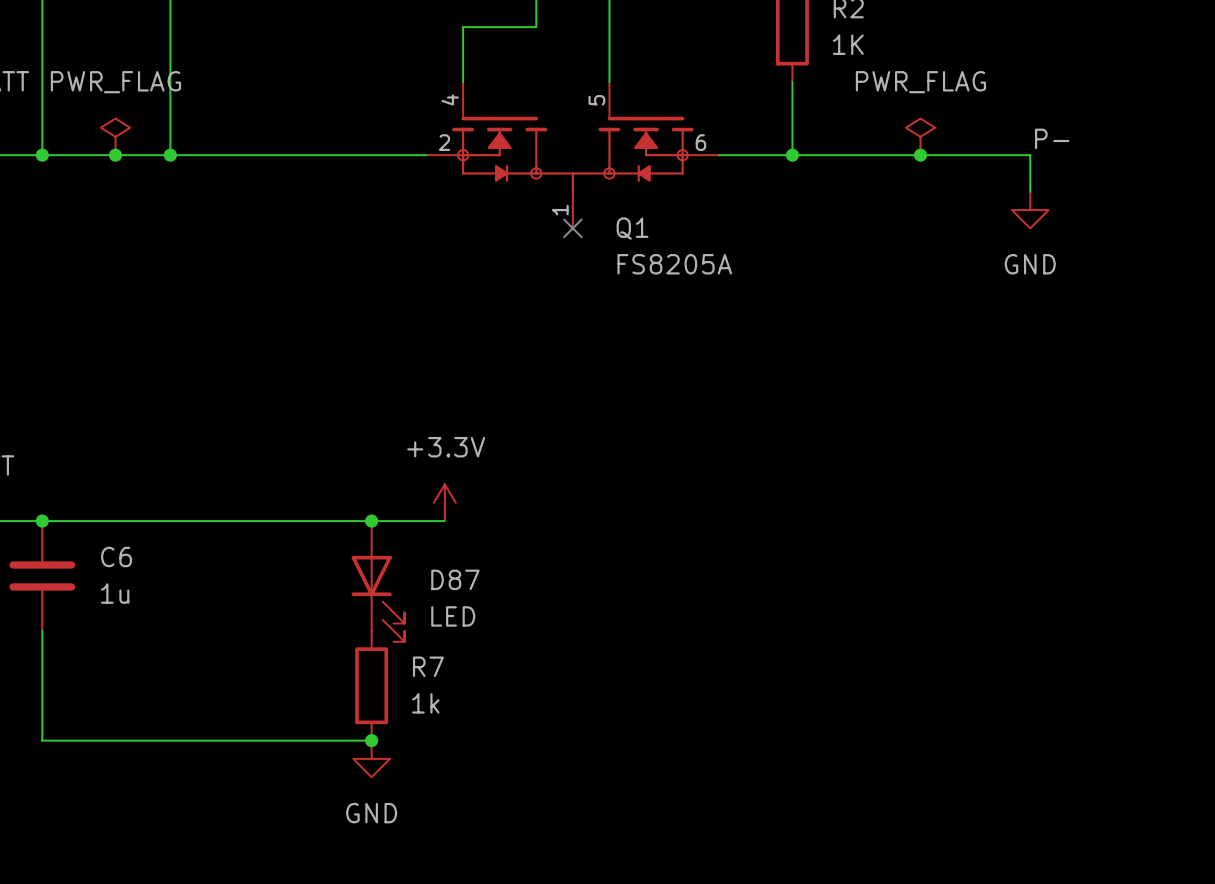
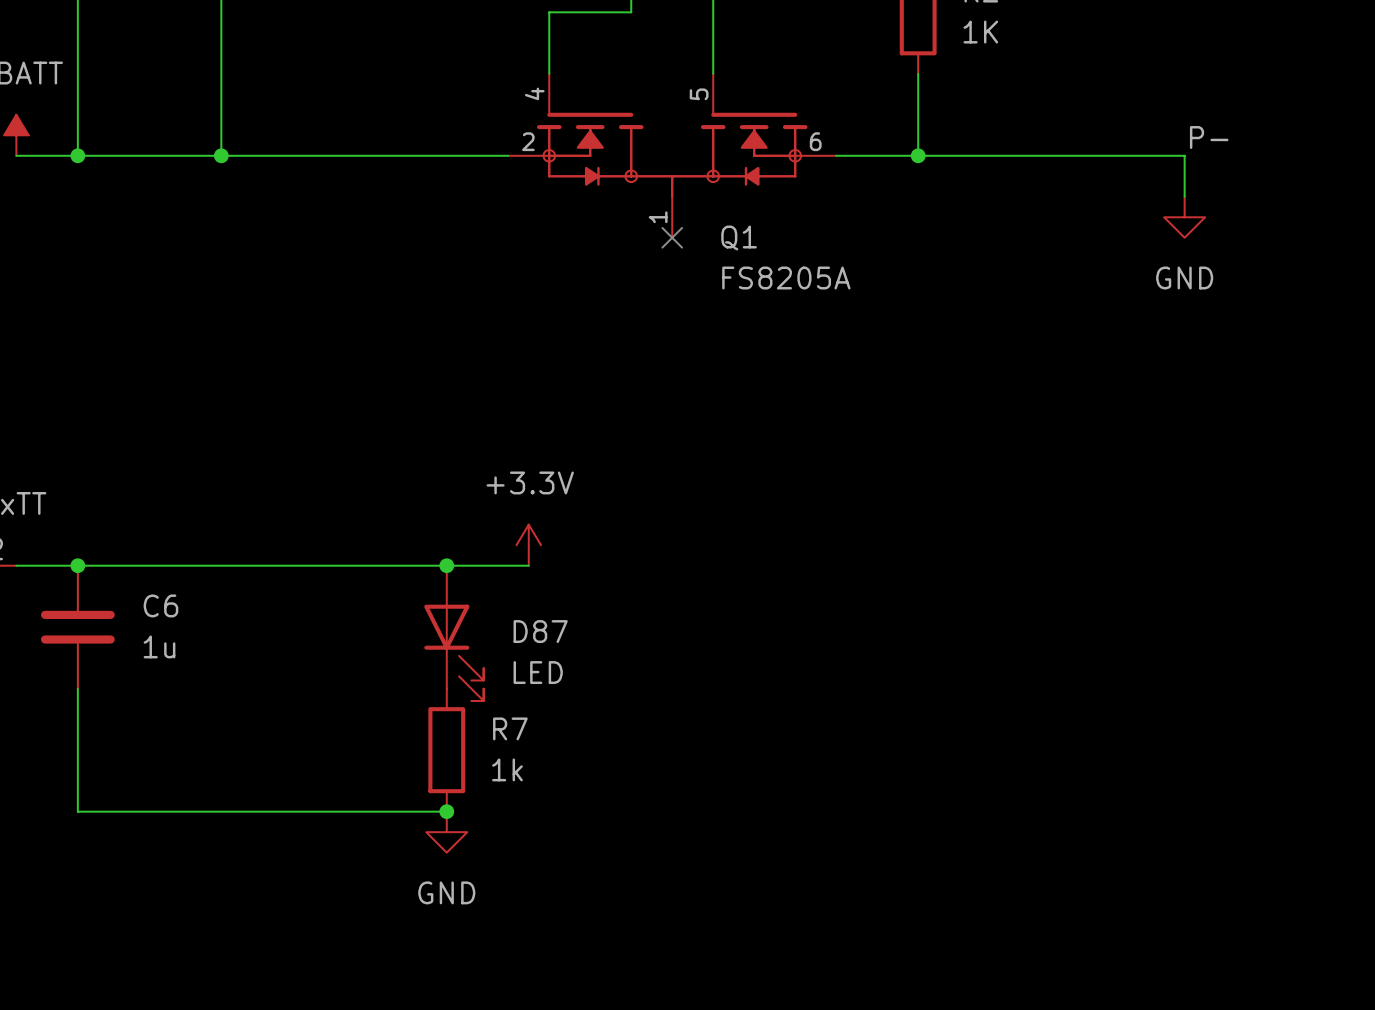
power symbol: PWR_FLAG (115, 136) -> none
power symbol: PWR_FLAG (920, 136) -> none
junction: (115, 155) -> none
junction: (920, 155) -> none

